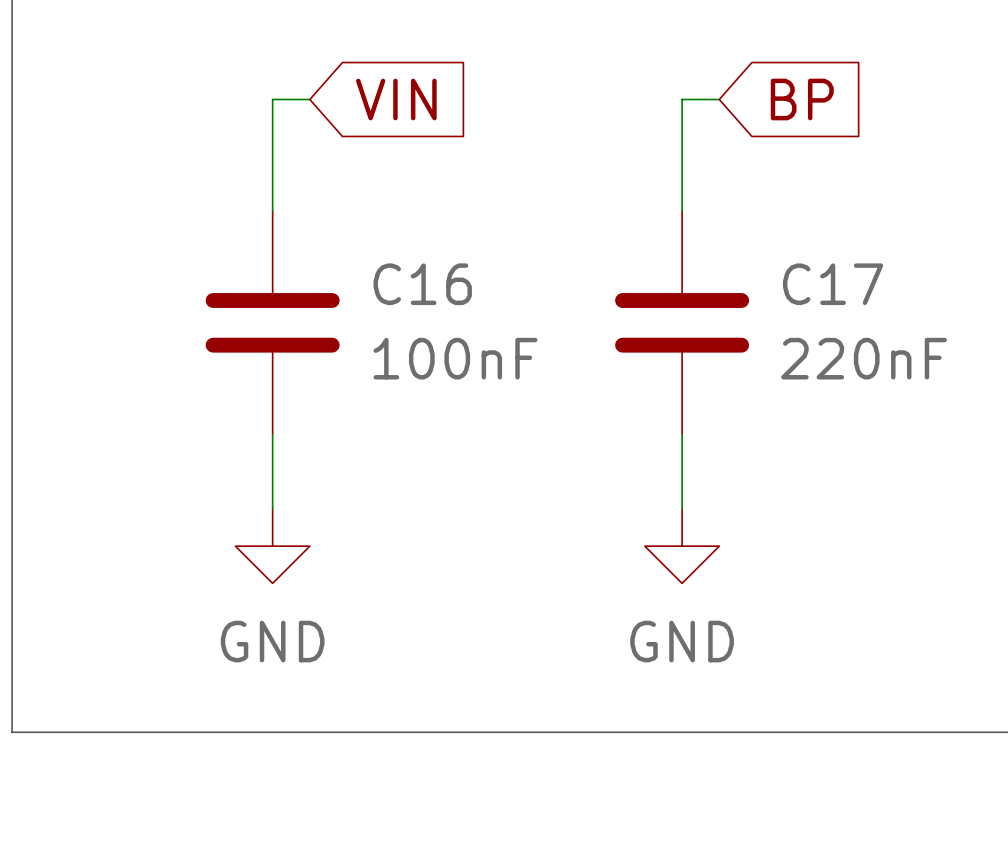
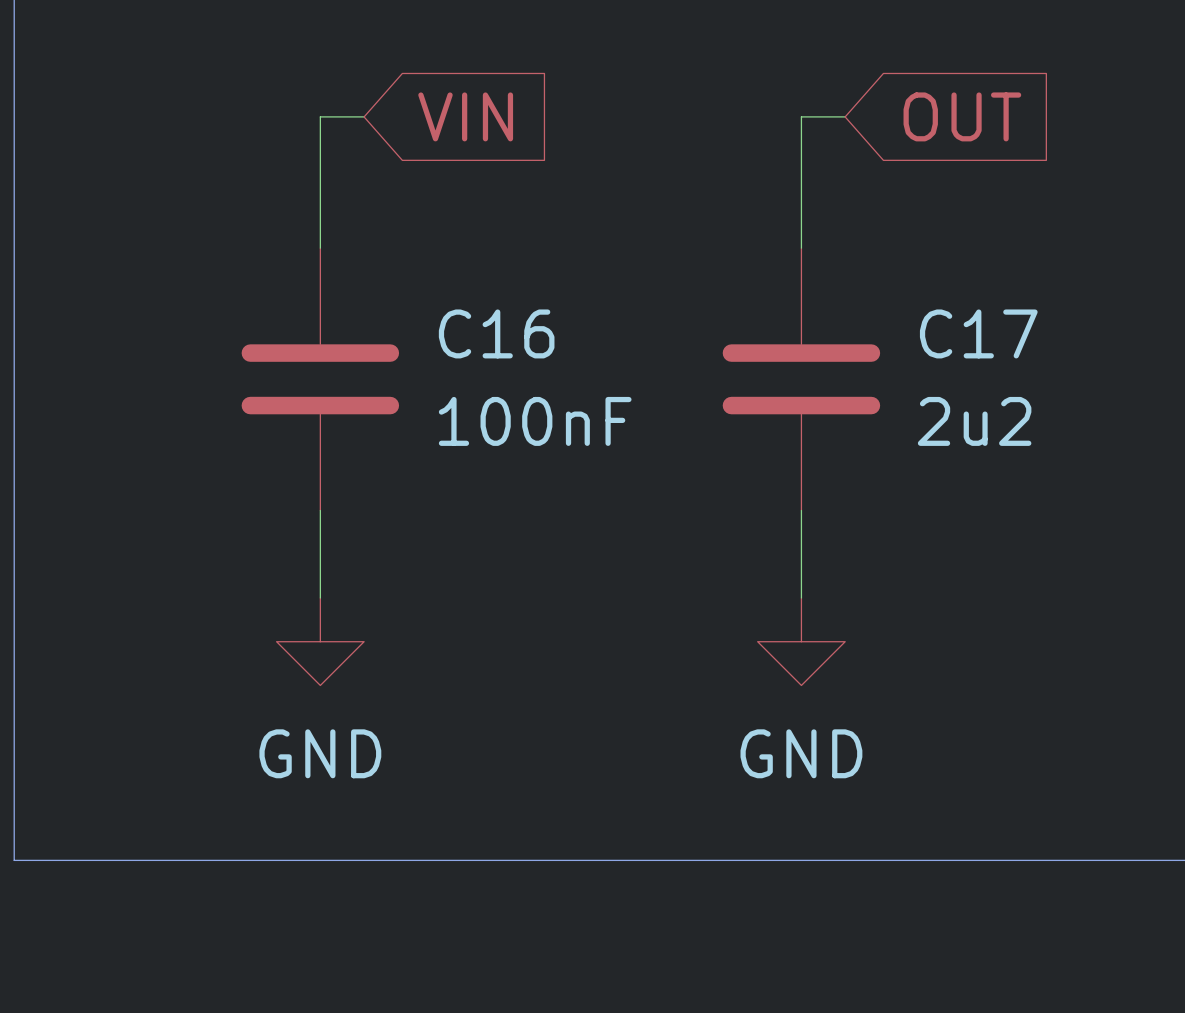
global label: BP (802, 99) -> OUT (962, 116)
C17 value: 220nF (864, 358) -> 2u2 (974, 421)

